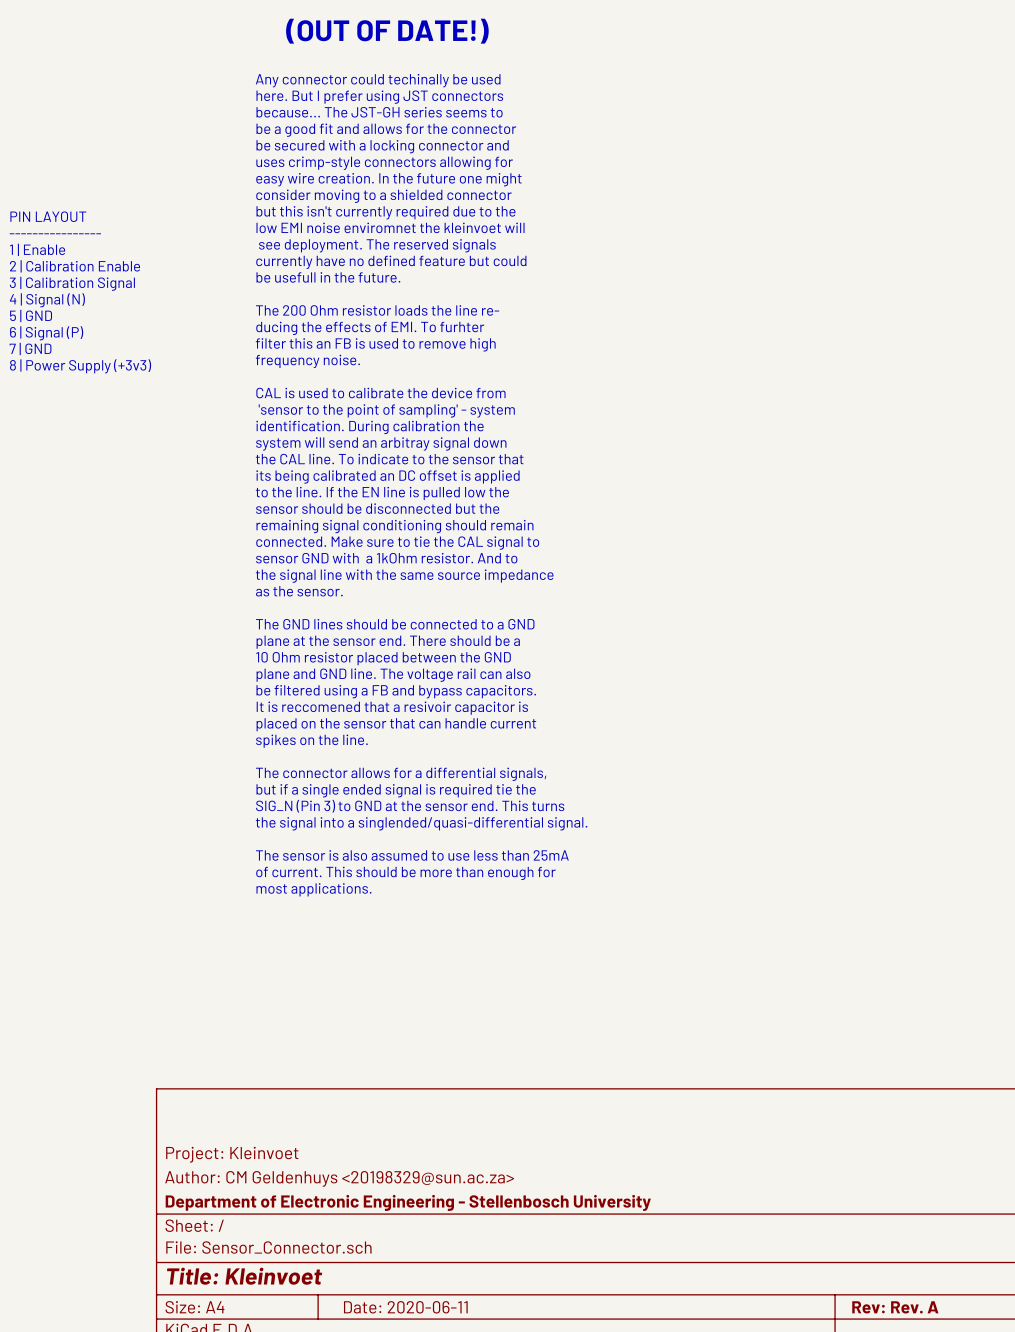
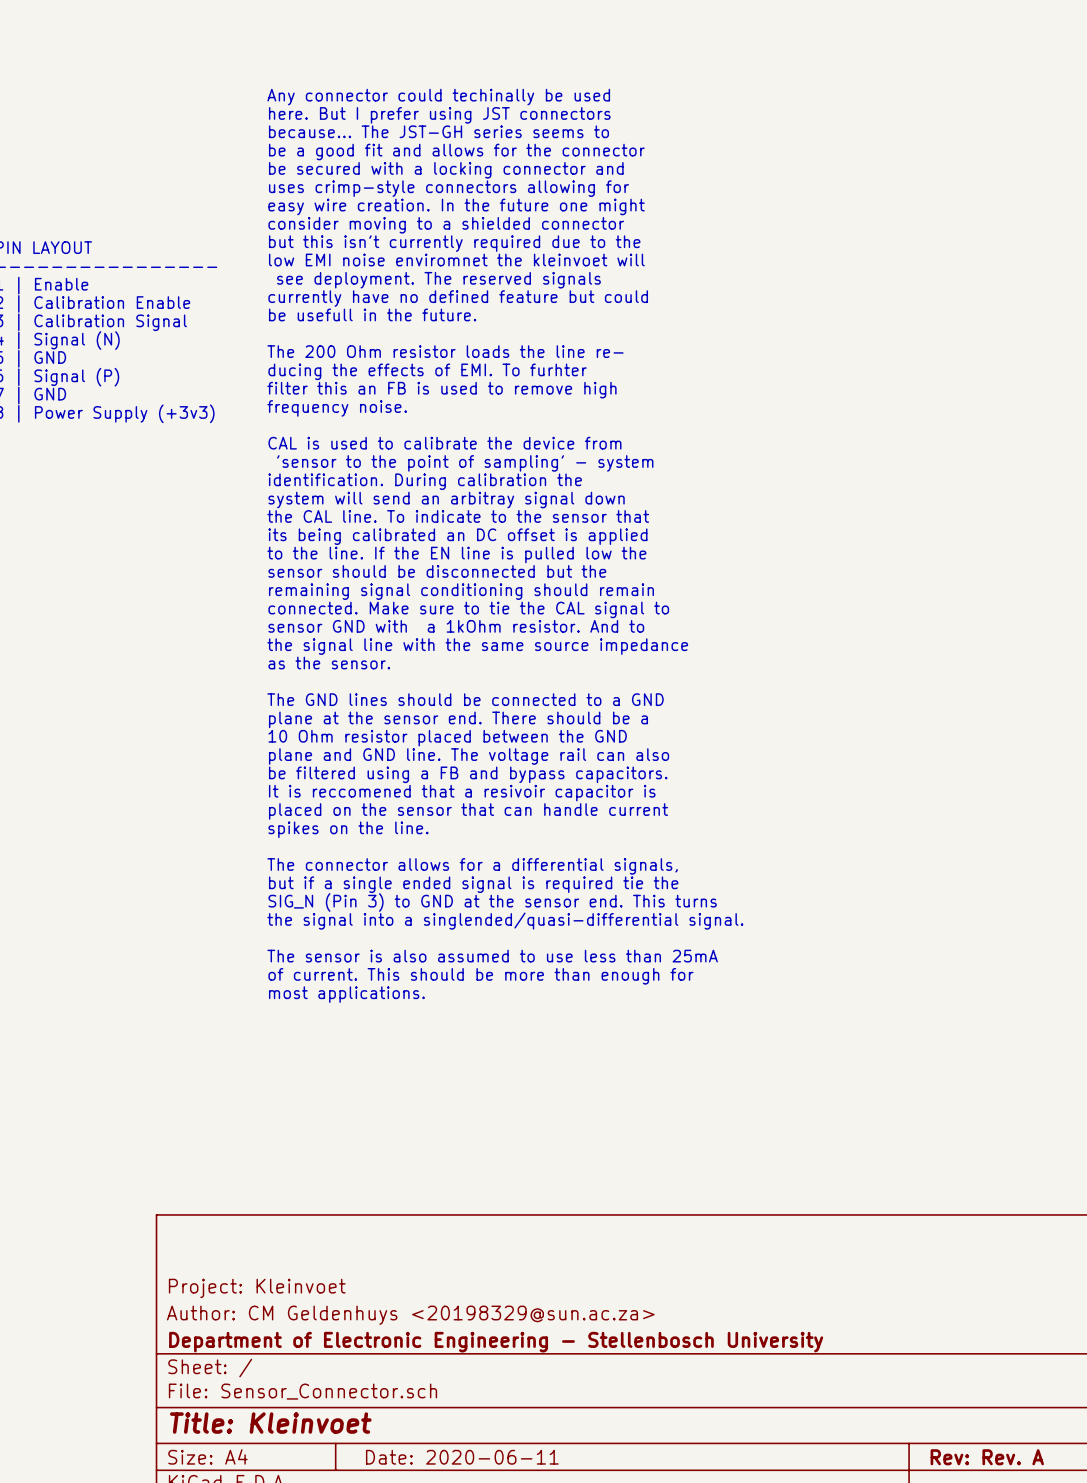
text: (OUT OF DATE!) (387, 31) -> none

